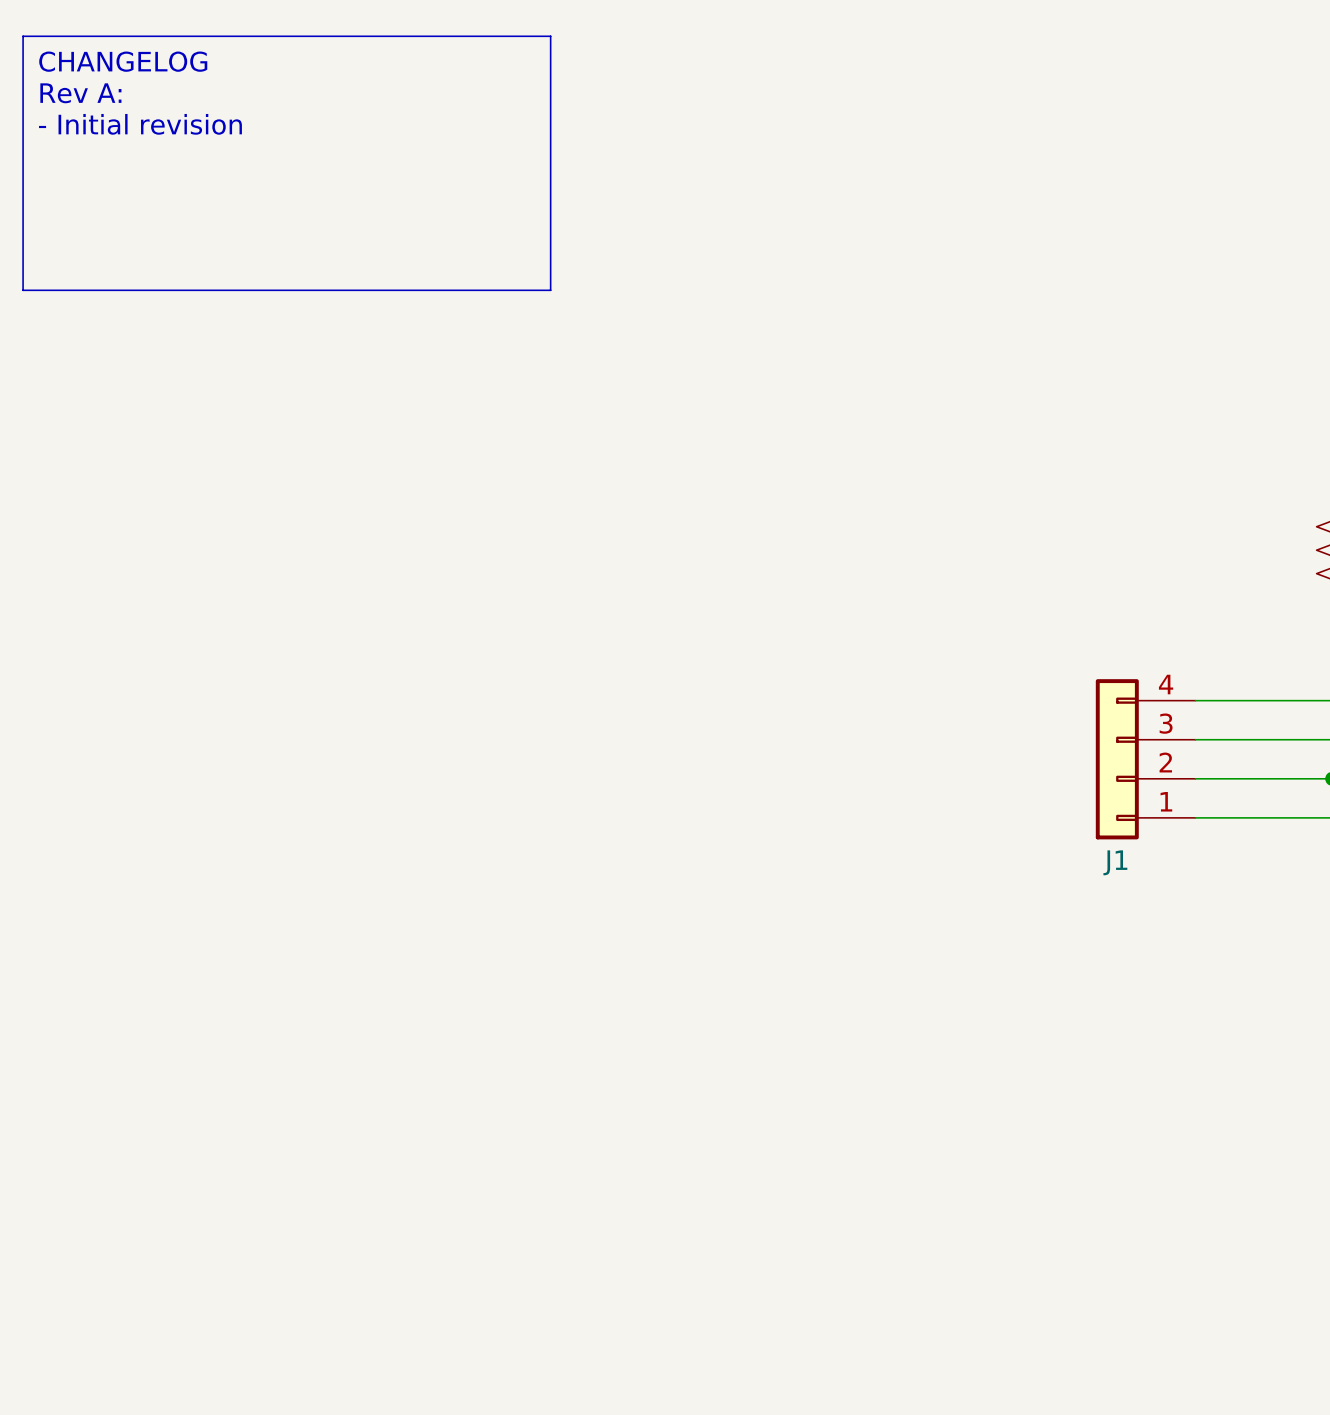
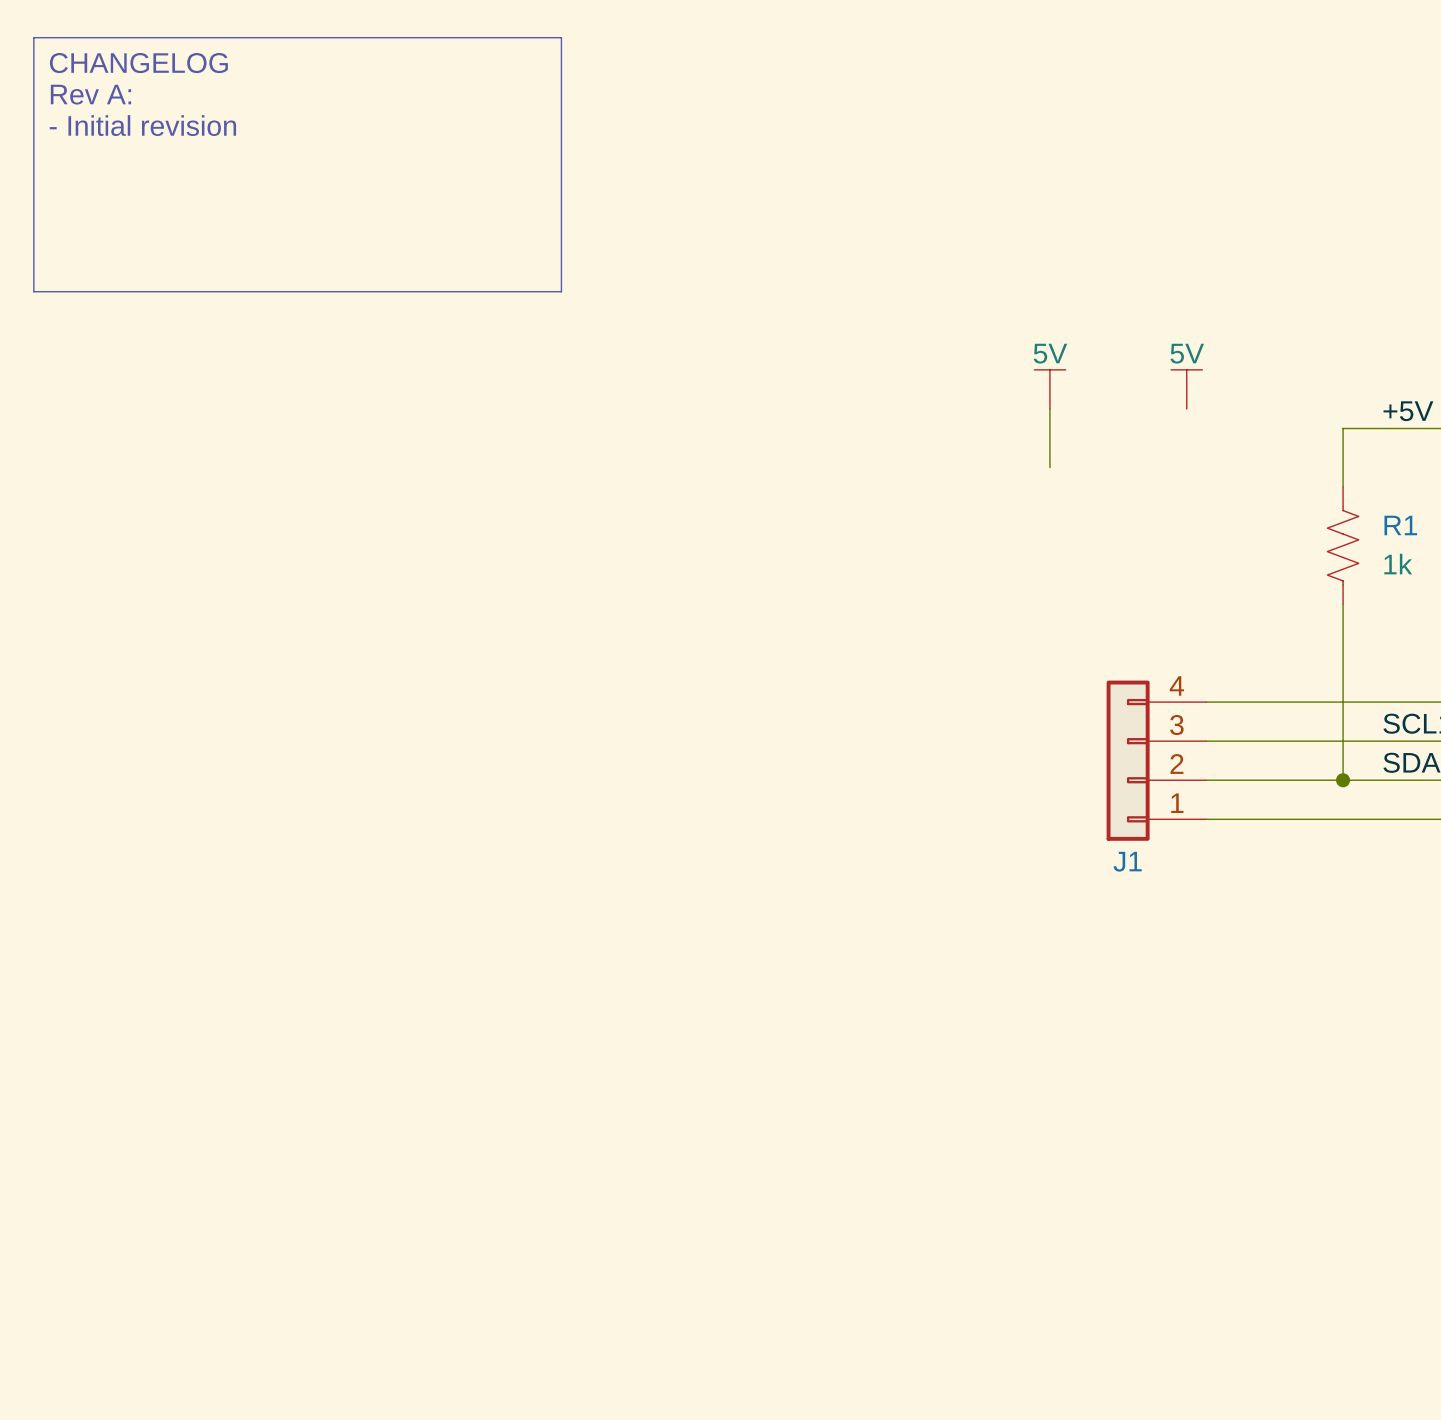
power symbol: none -> 5V (1049, 389)
power symbol: none -> 5V (1186, 389)
wire: none -> (1049, 408) (1049, 467)

